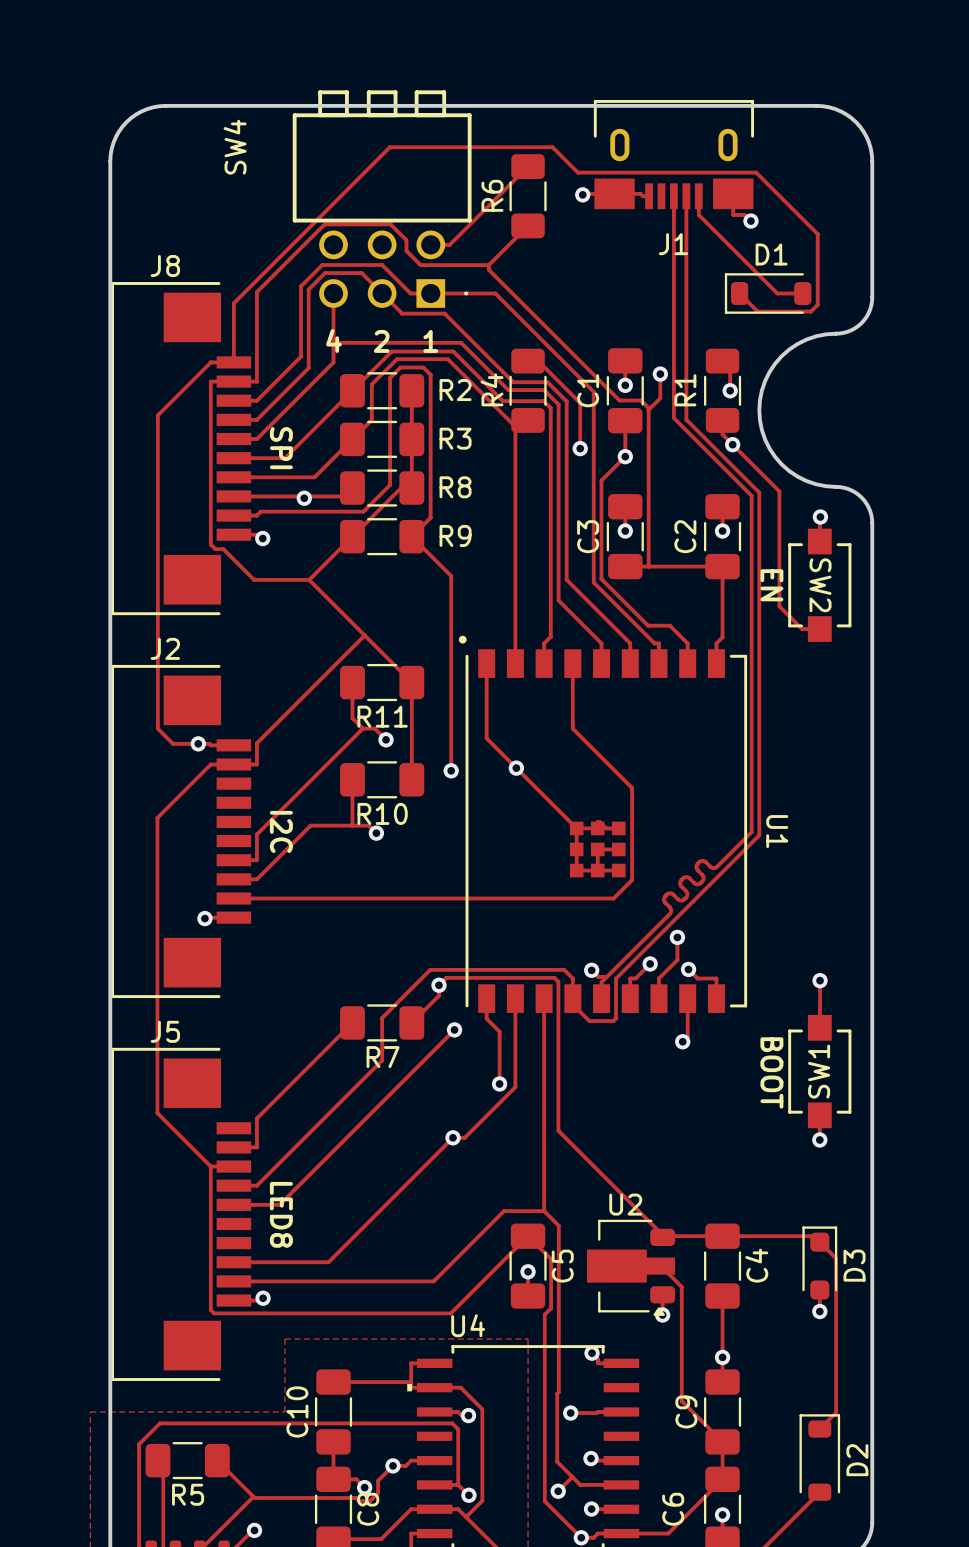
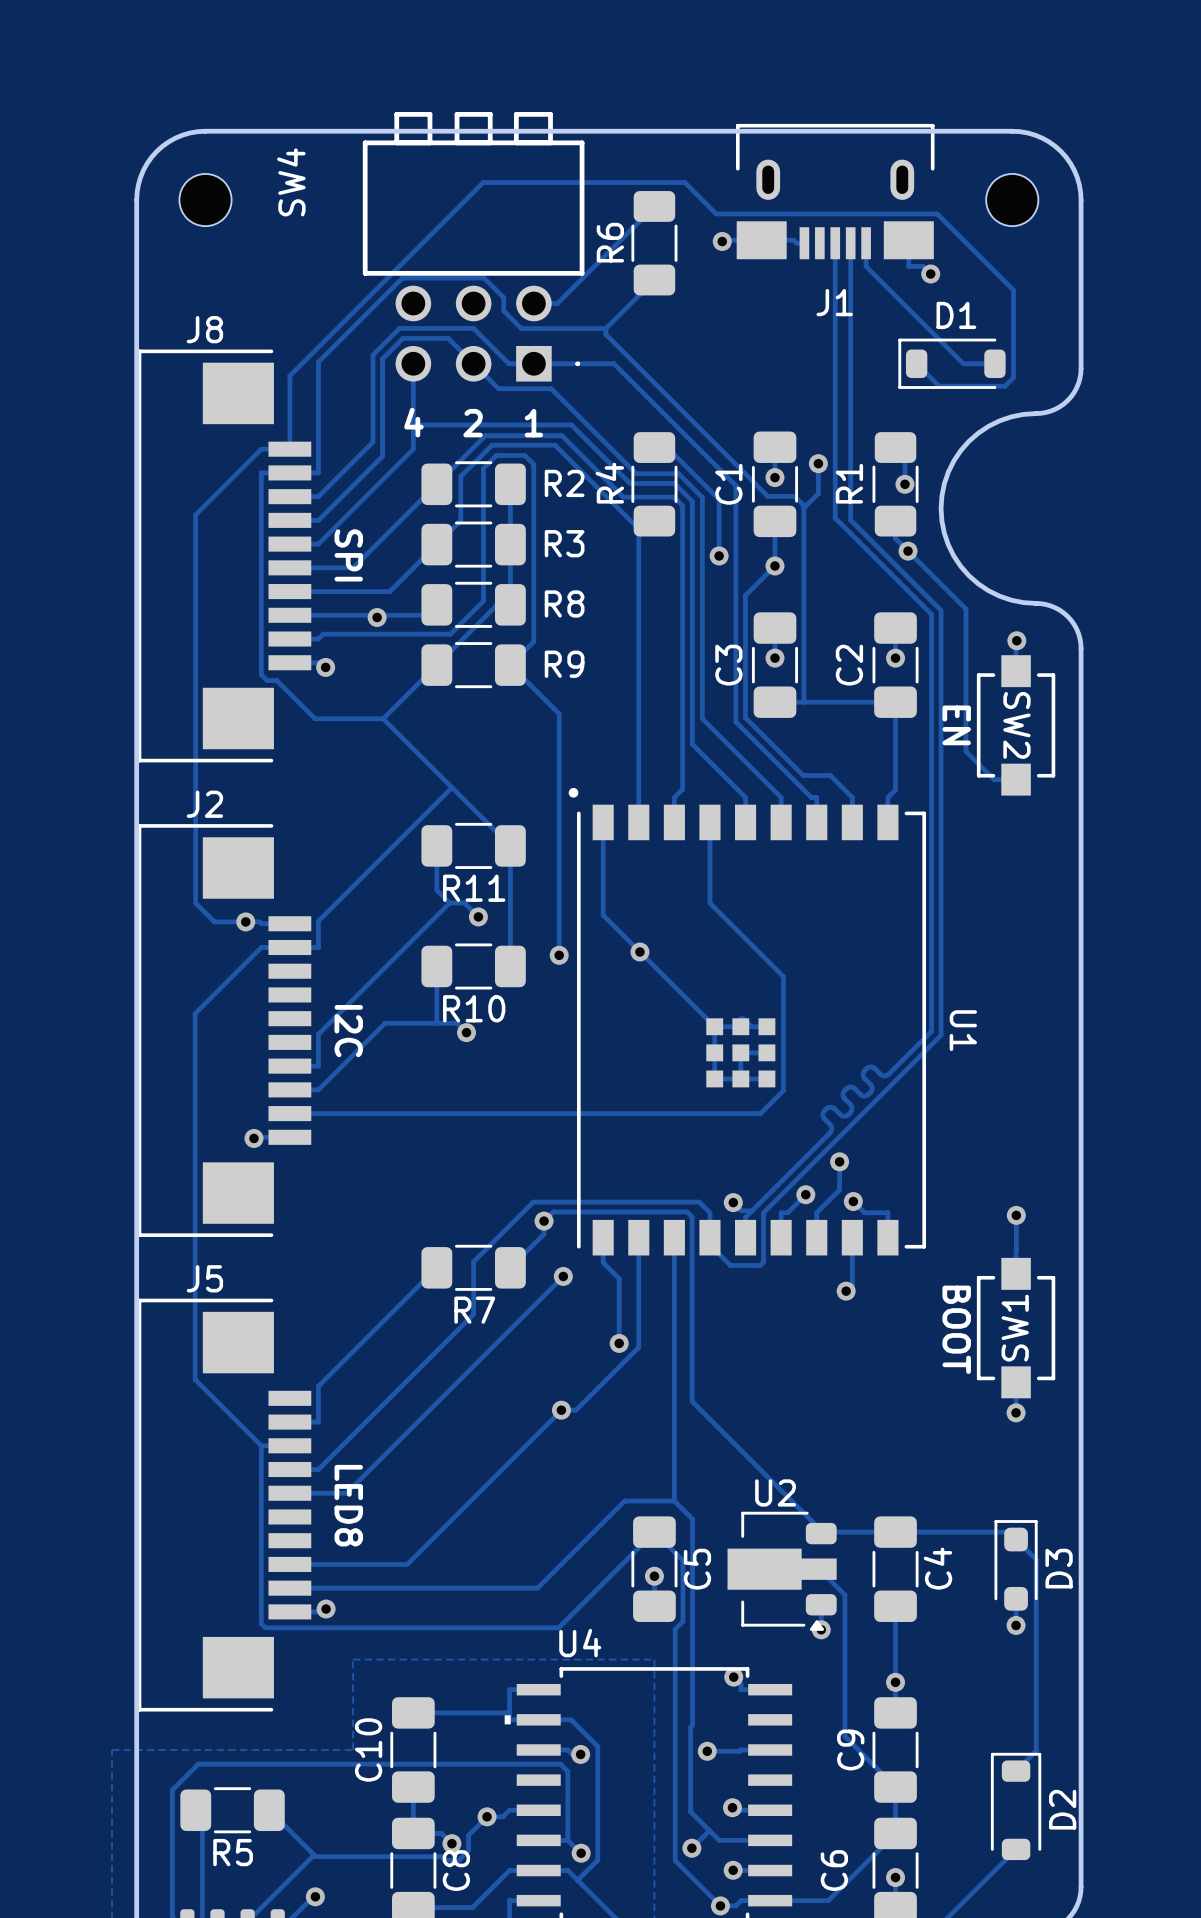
part: none -> (205, 200)
part: none -> (1012, 200)

